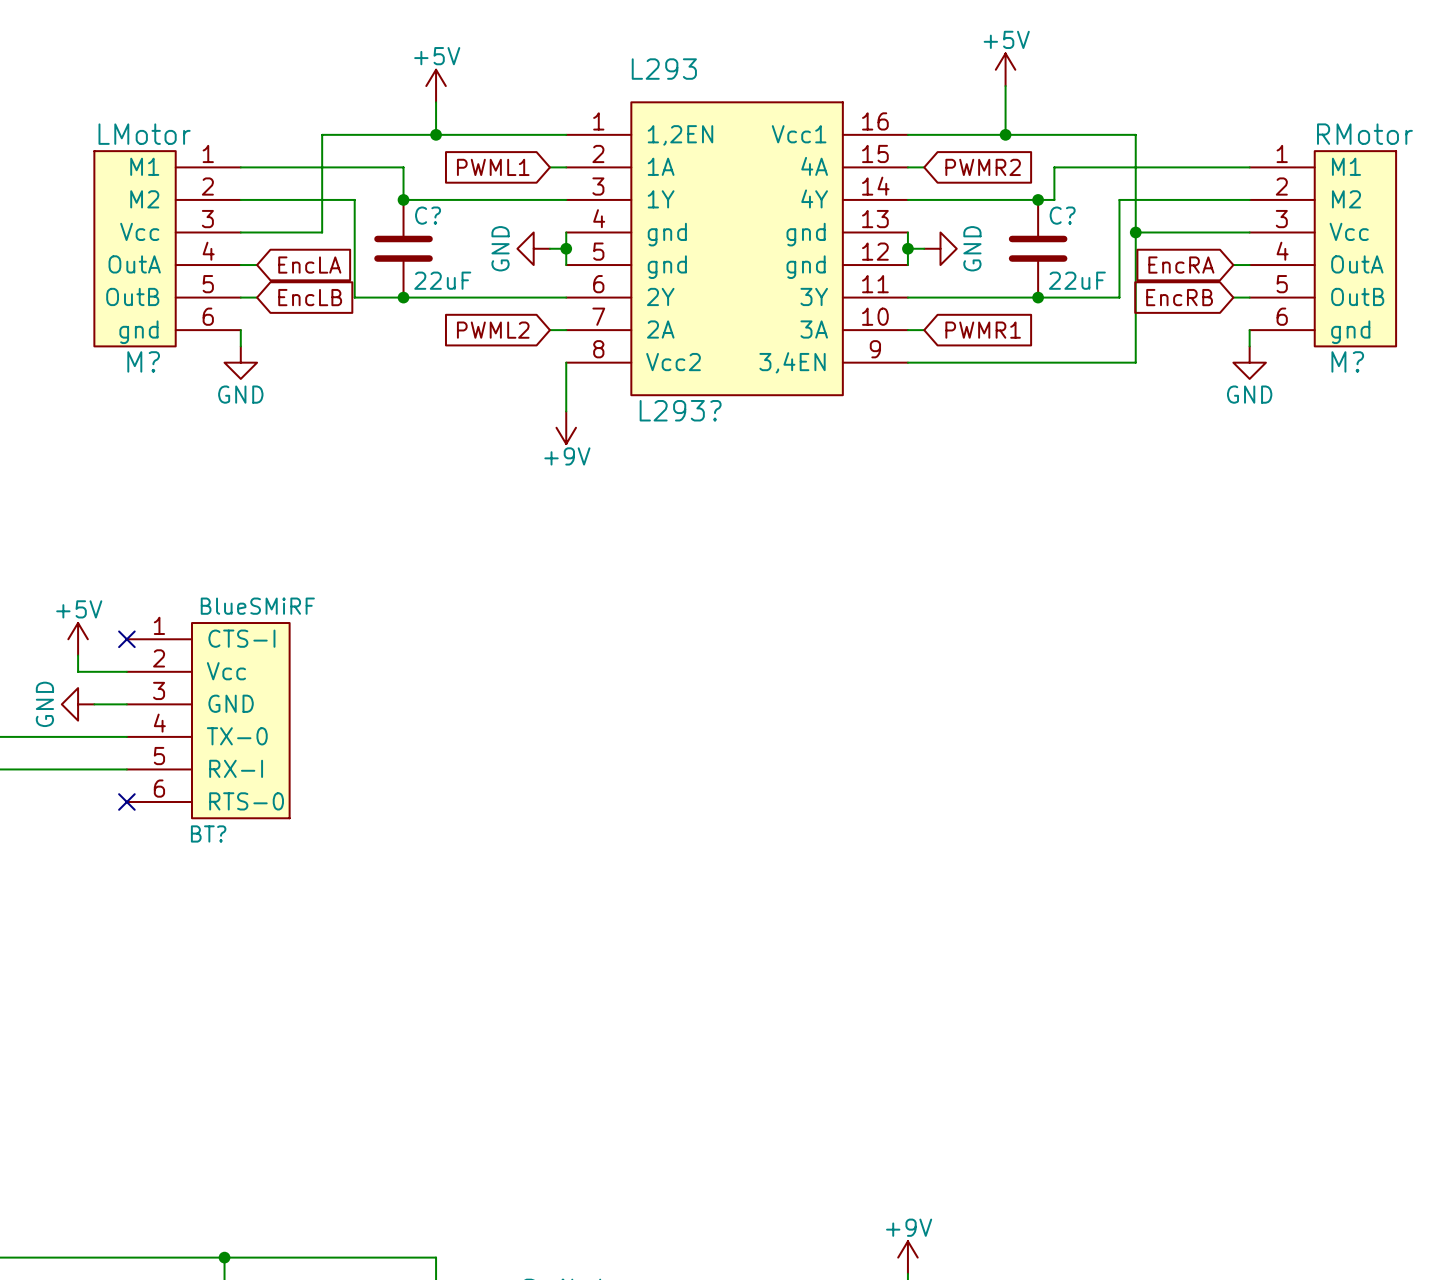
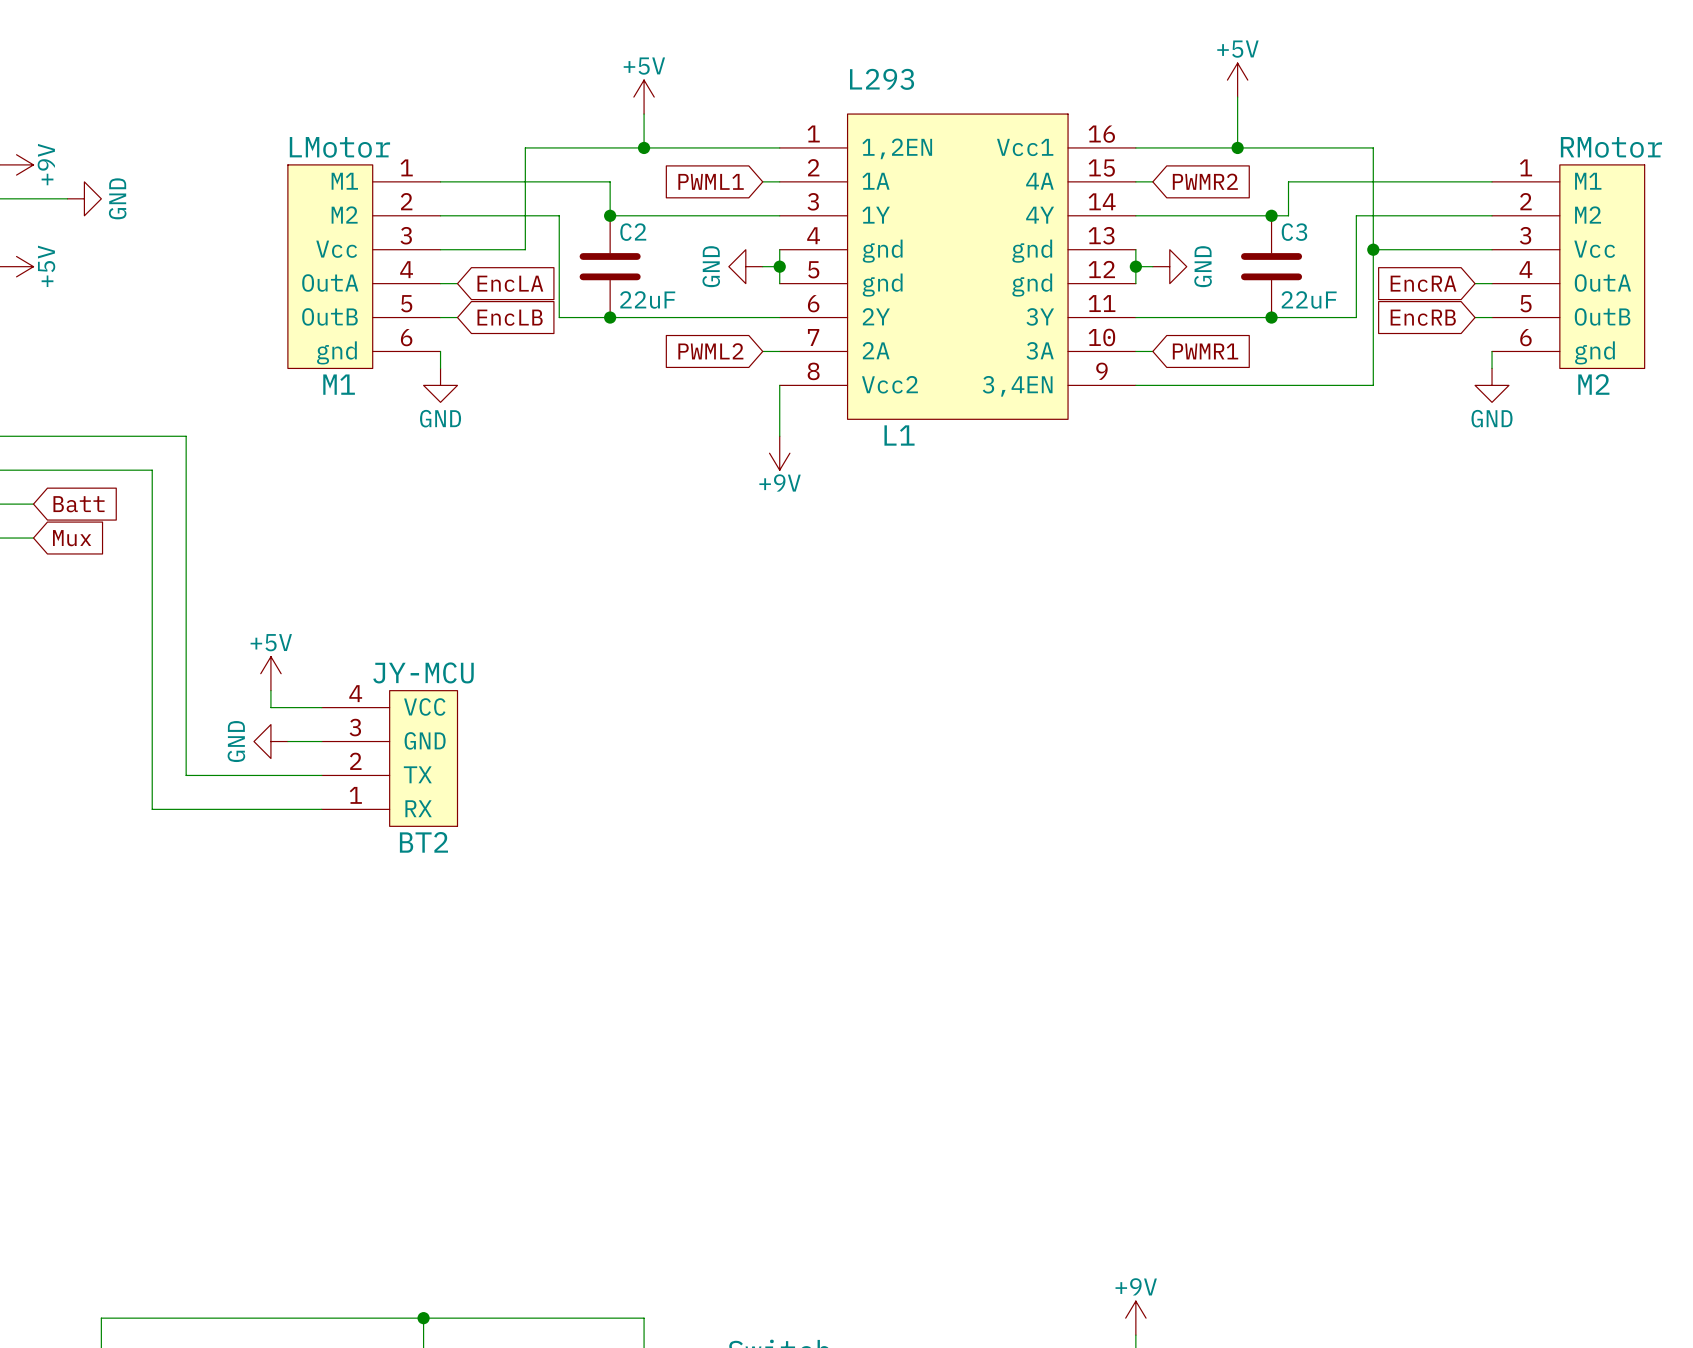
C? name: C? (428, 215) -> C2 (633, 232)
C? name: C? (1062, 215) -> C3 (1294, 232)
M? name: M? (143, 361) -> M1 (339, 384)
M? name: M? (1347, 361) -> M2 (1593, 384)
L293? name: L293? (680, 410) -> L1 (899, 435)
no-connect mark: (126, 639) -> none
BT2: none -> JY-MCU (389, 758)
BT?: BlueSMiRF (208, 720) -> none
no-connect mark: (126, 802) -> none

